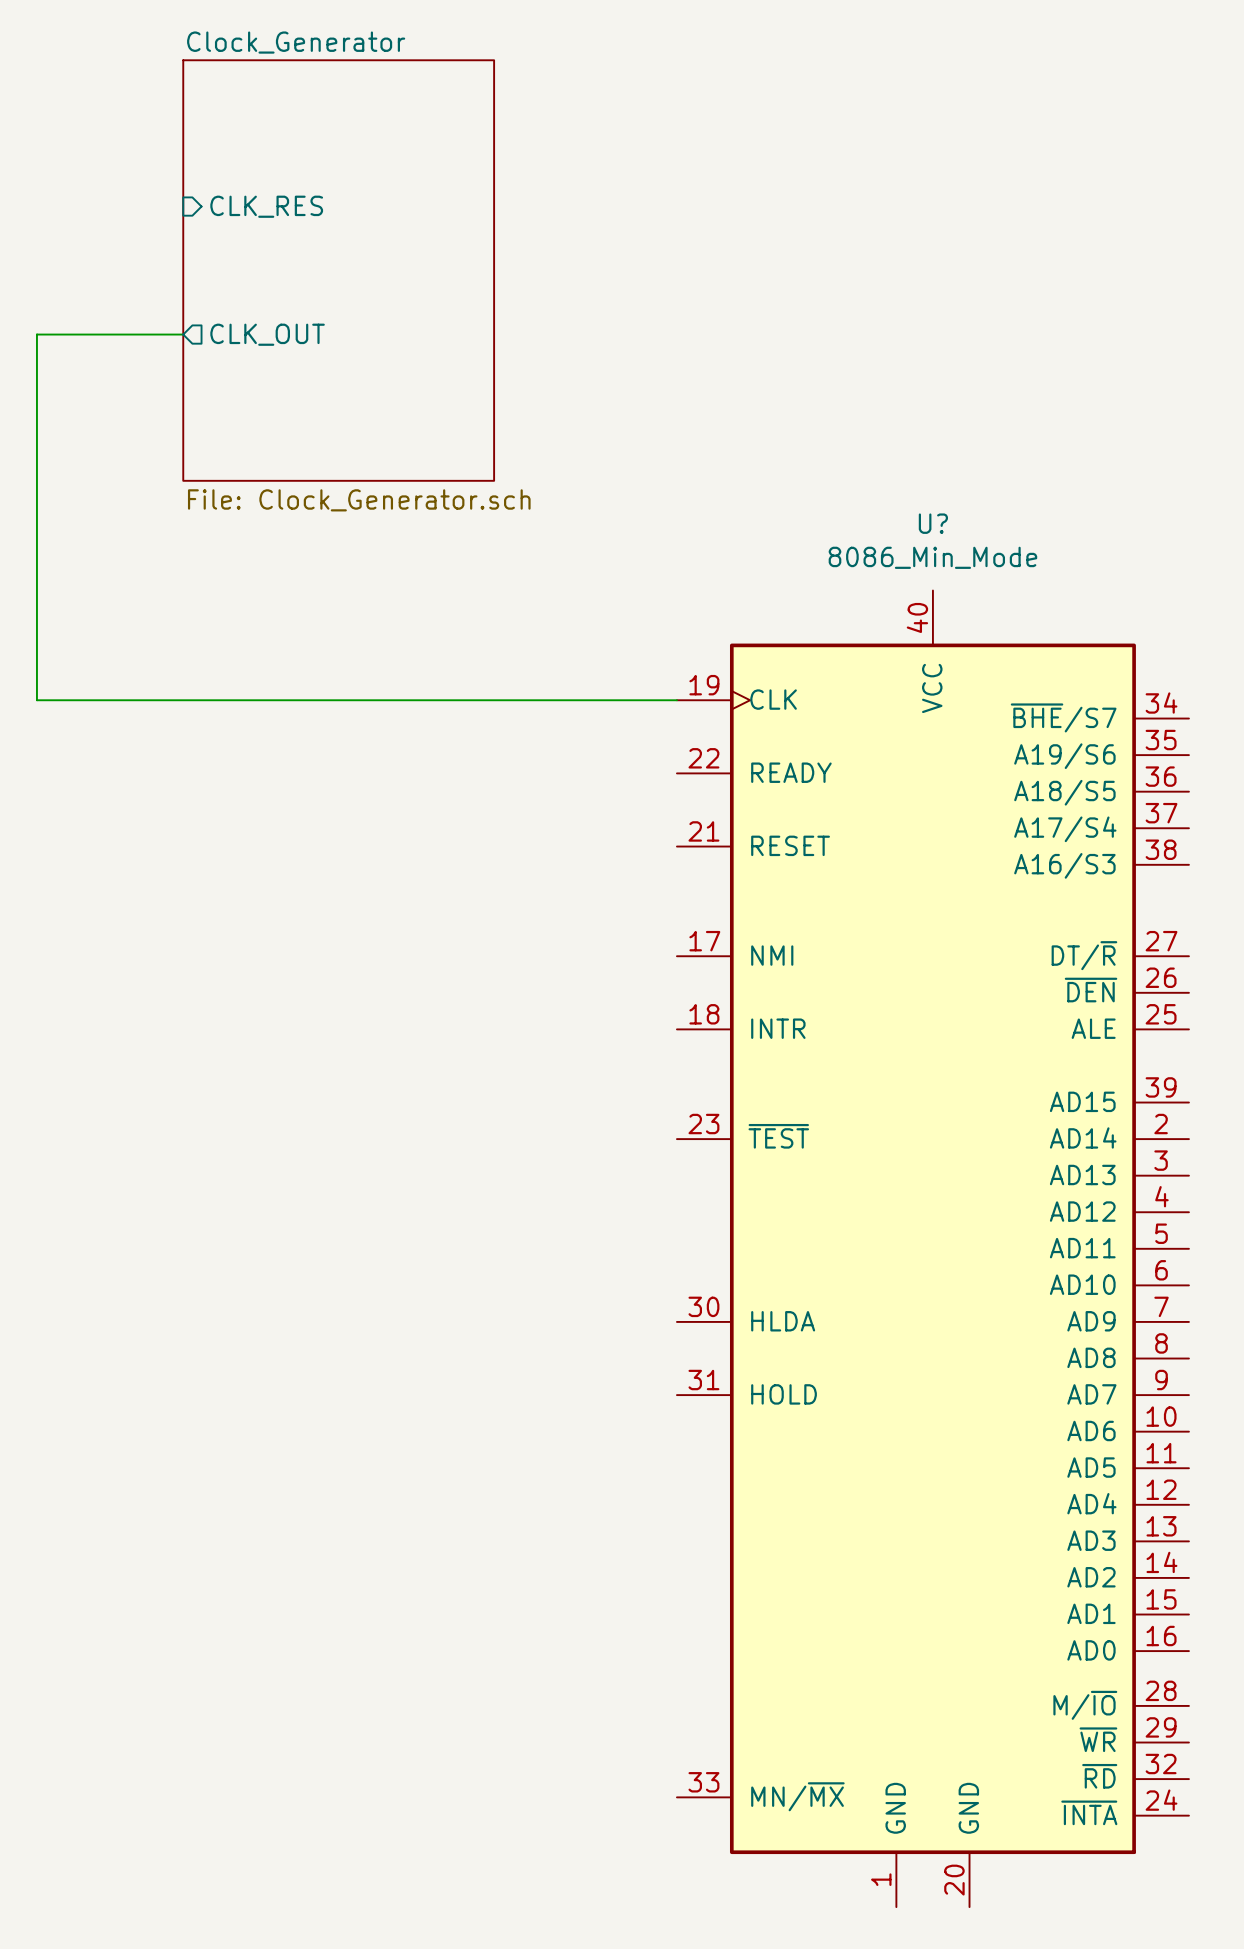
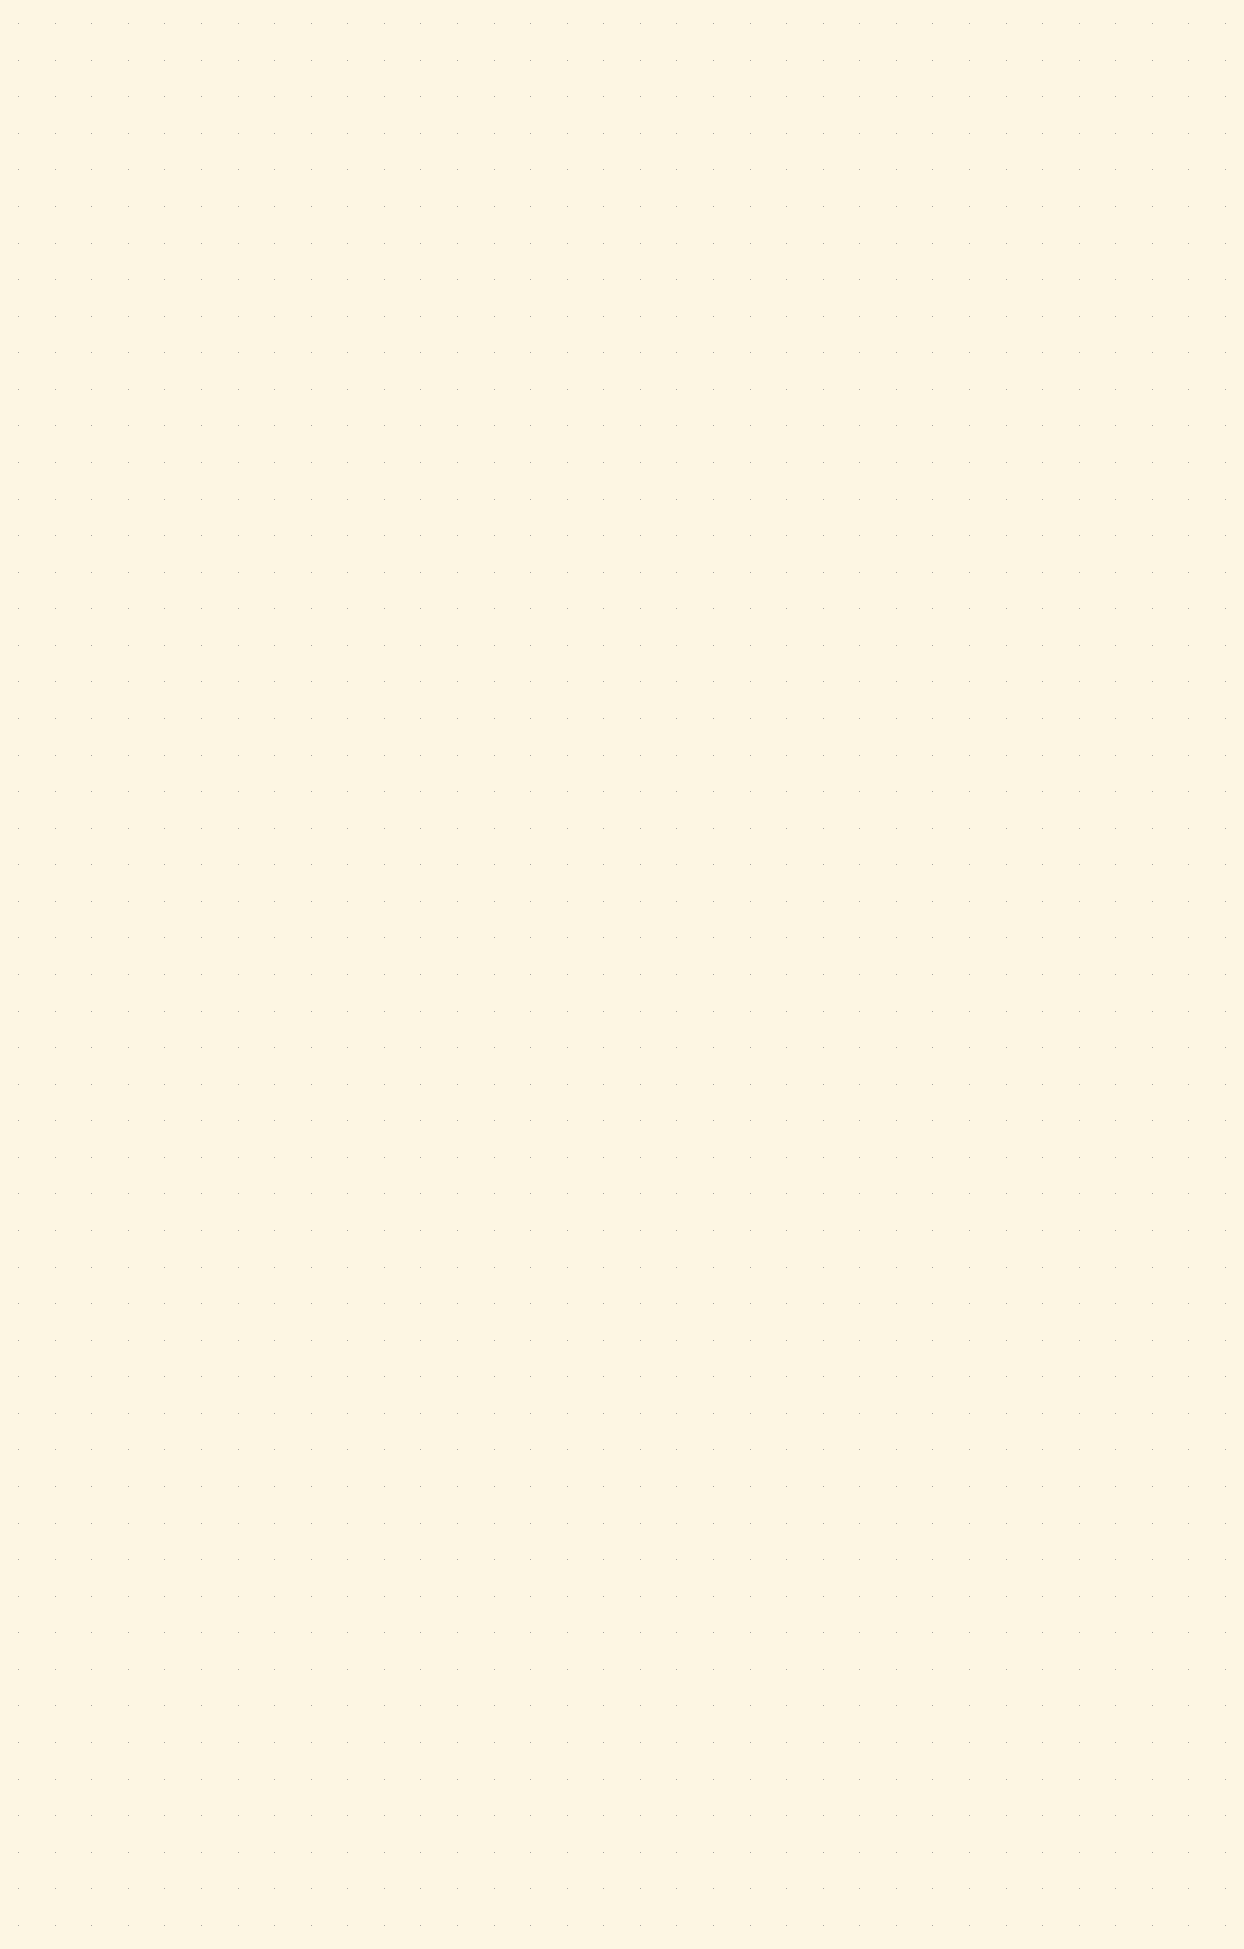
sheet pin: CLK_RES (266, 206) -> none
sheet Clock_Generator: File: Clock_Generator.sch (338, 270) -> none
wire: (183, 334) (36, 334) (36, 700) (676, 700) -> none
sheet pin: CLK_OUT (267, 334) -> none
U?: 8086_Min_Mode (932, 1248) -> none

